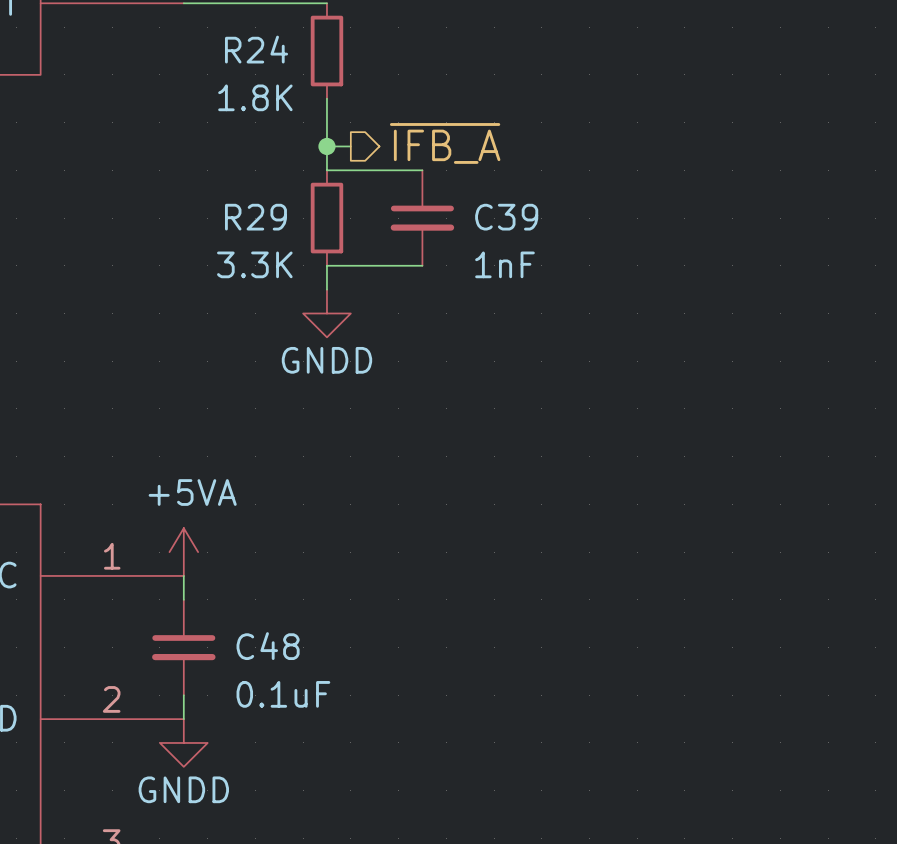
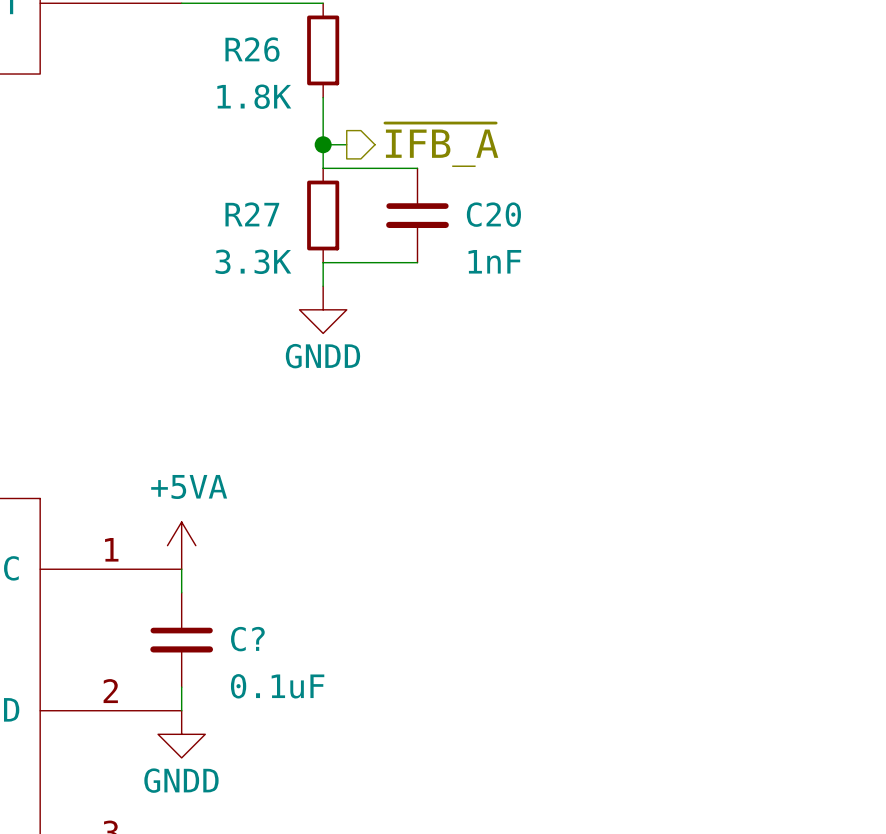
R24 name: R24 (256, 49) -> R26 (252, 49)
R29 name: R29 (255, 217) -> R27 (252, 214)
C39 name: C39 (506, 217) -> C20 (493, 214)
C48 name: C48 (268, 646) -> C? (247, 639)

